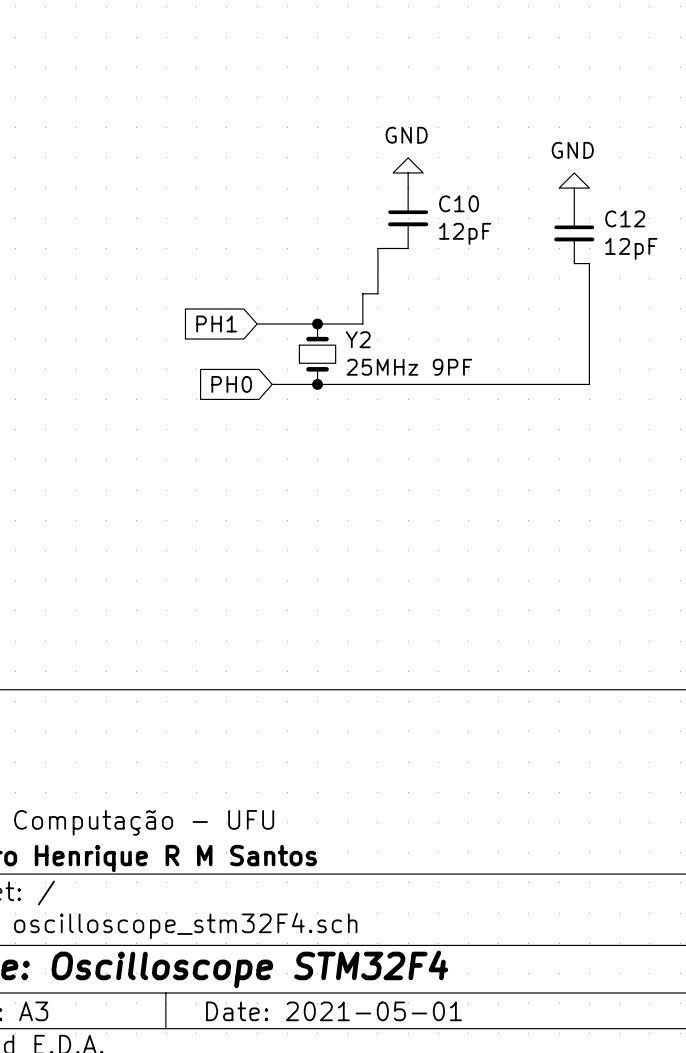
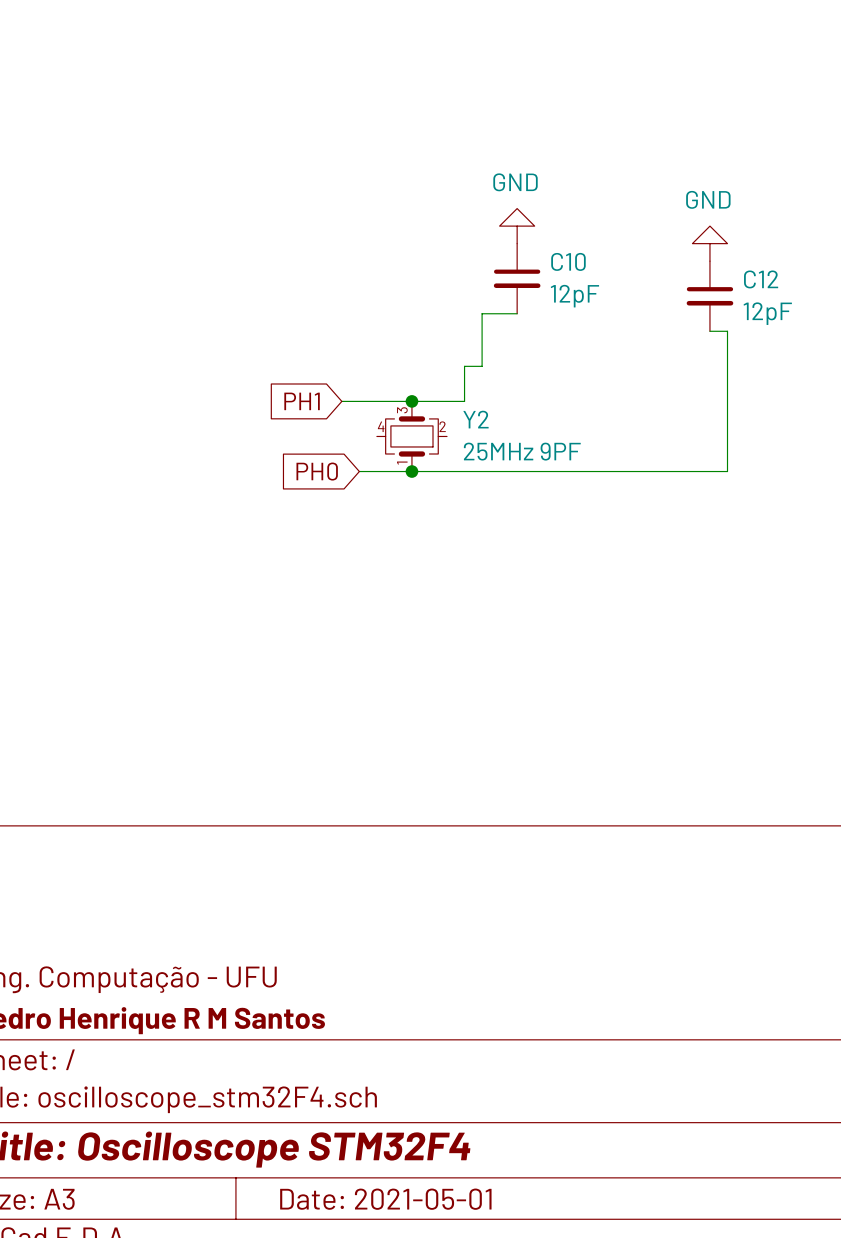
Y2 symbol: [299, 324, 336, 385] -> [376, 401, 448, 472]

